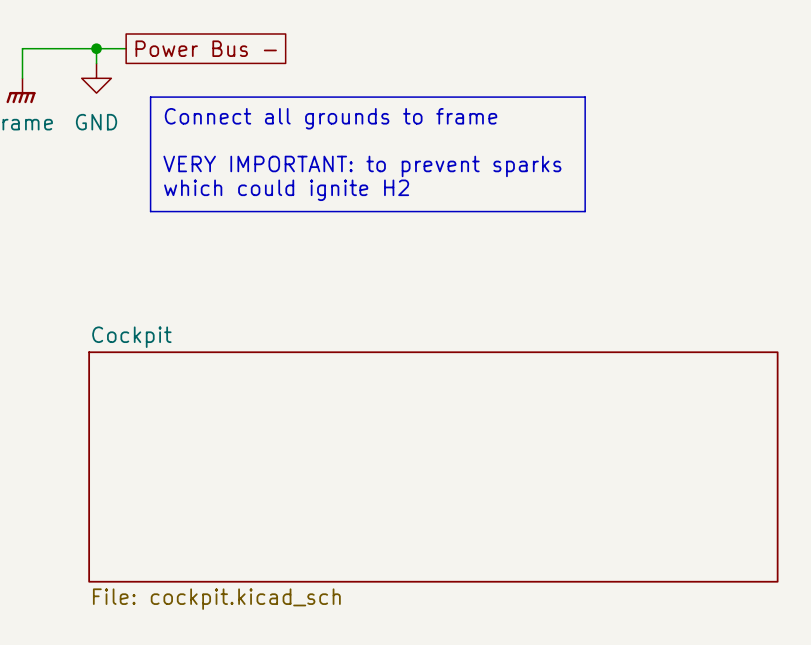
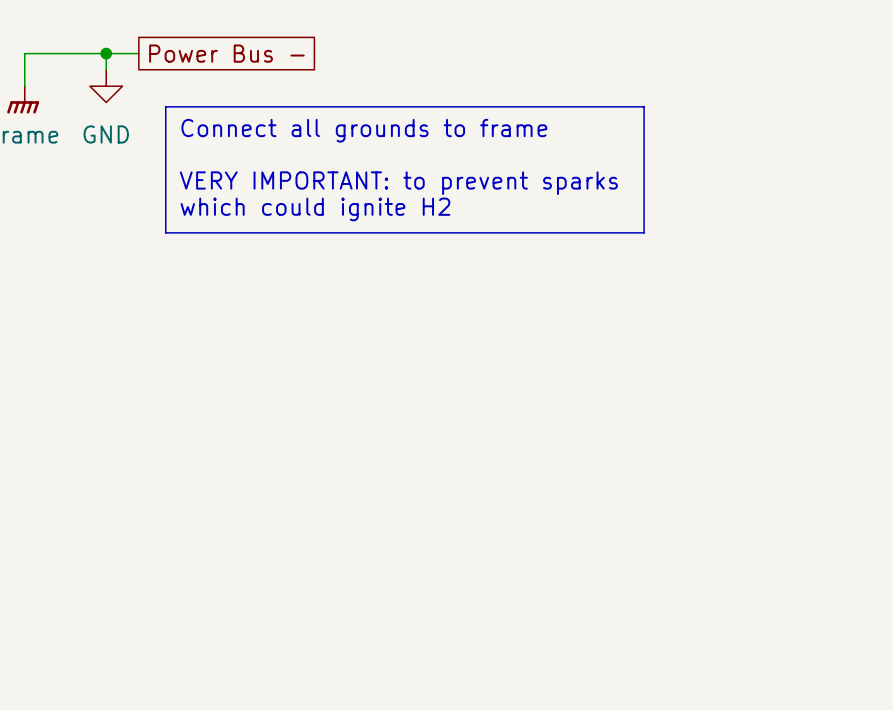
sheet Cockpit: File: cockpit.kicad_sch (433, 466) -> none

